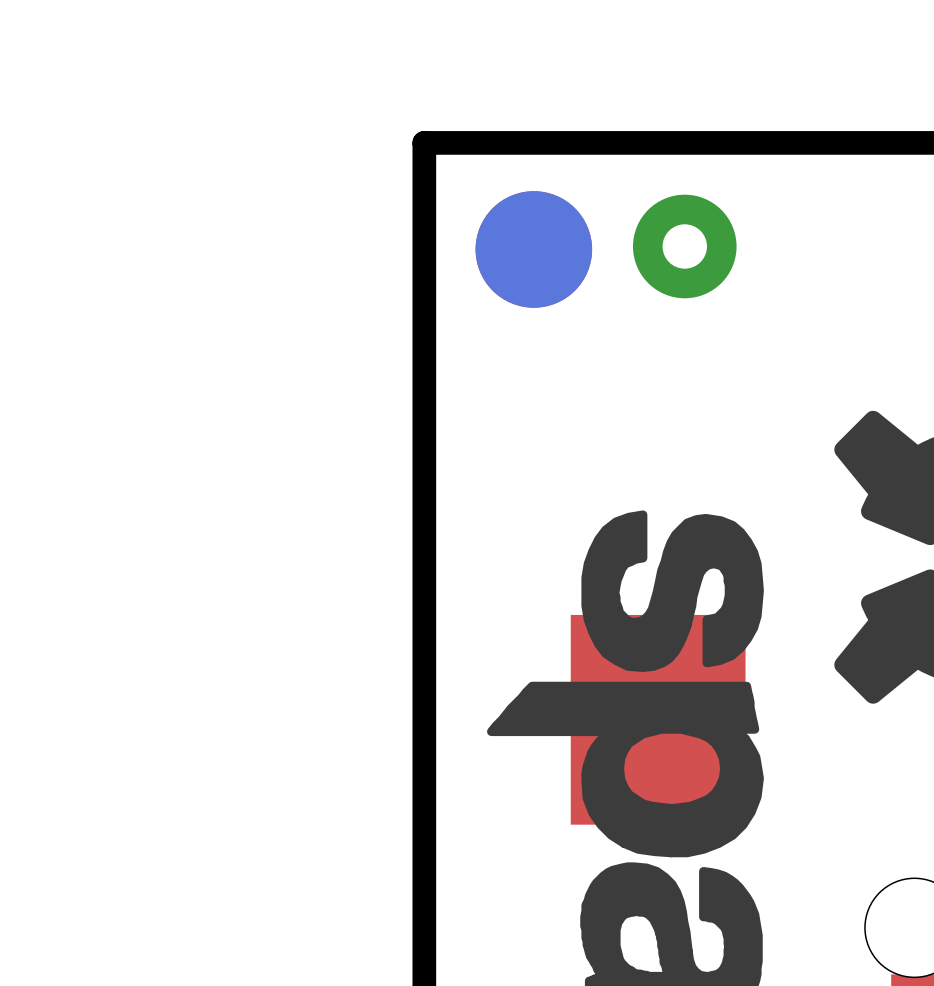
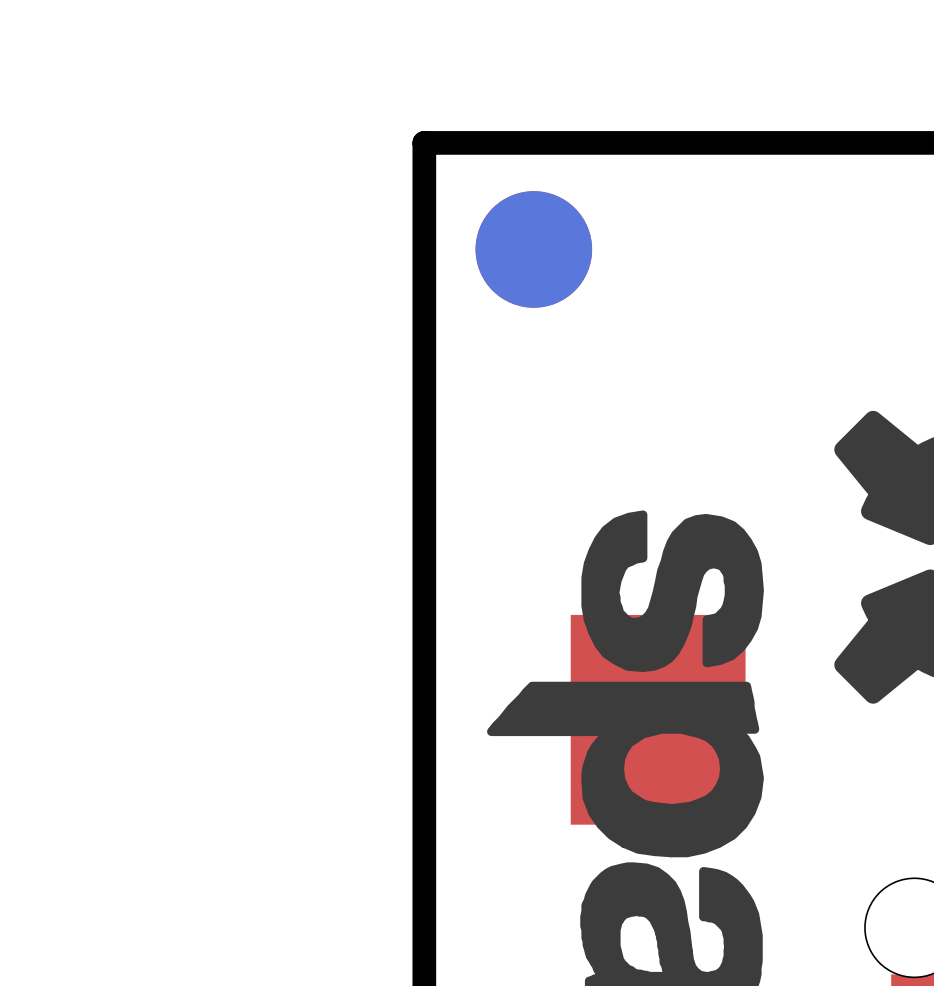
via: (684, 246) -> none

